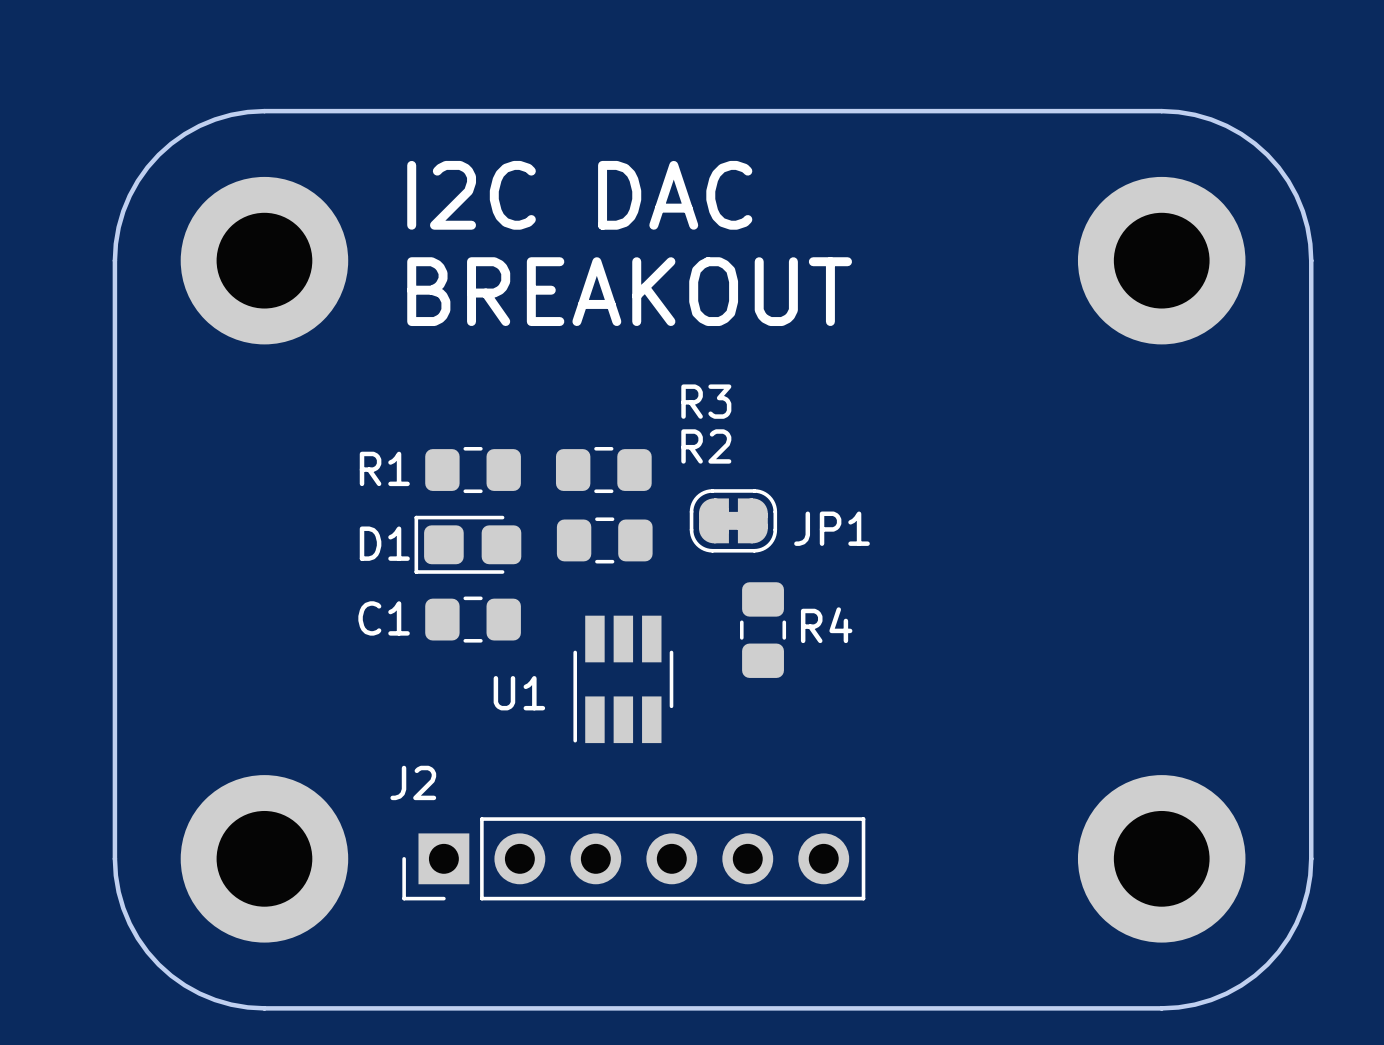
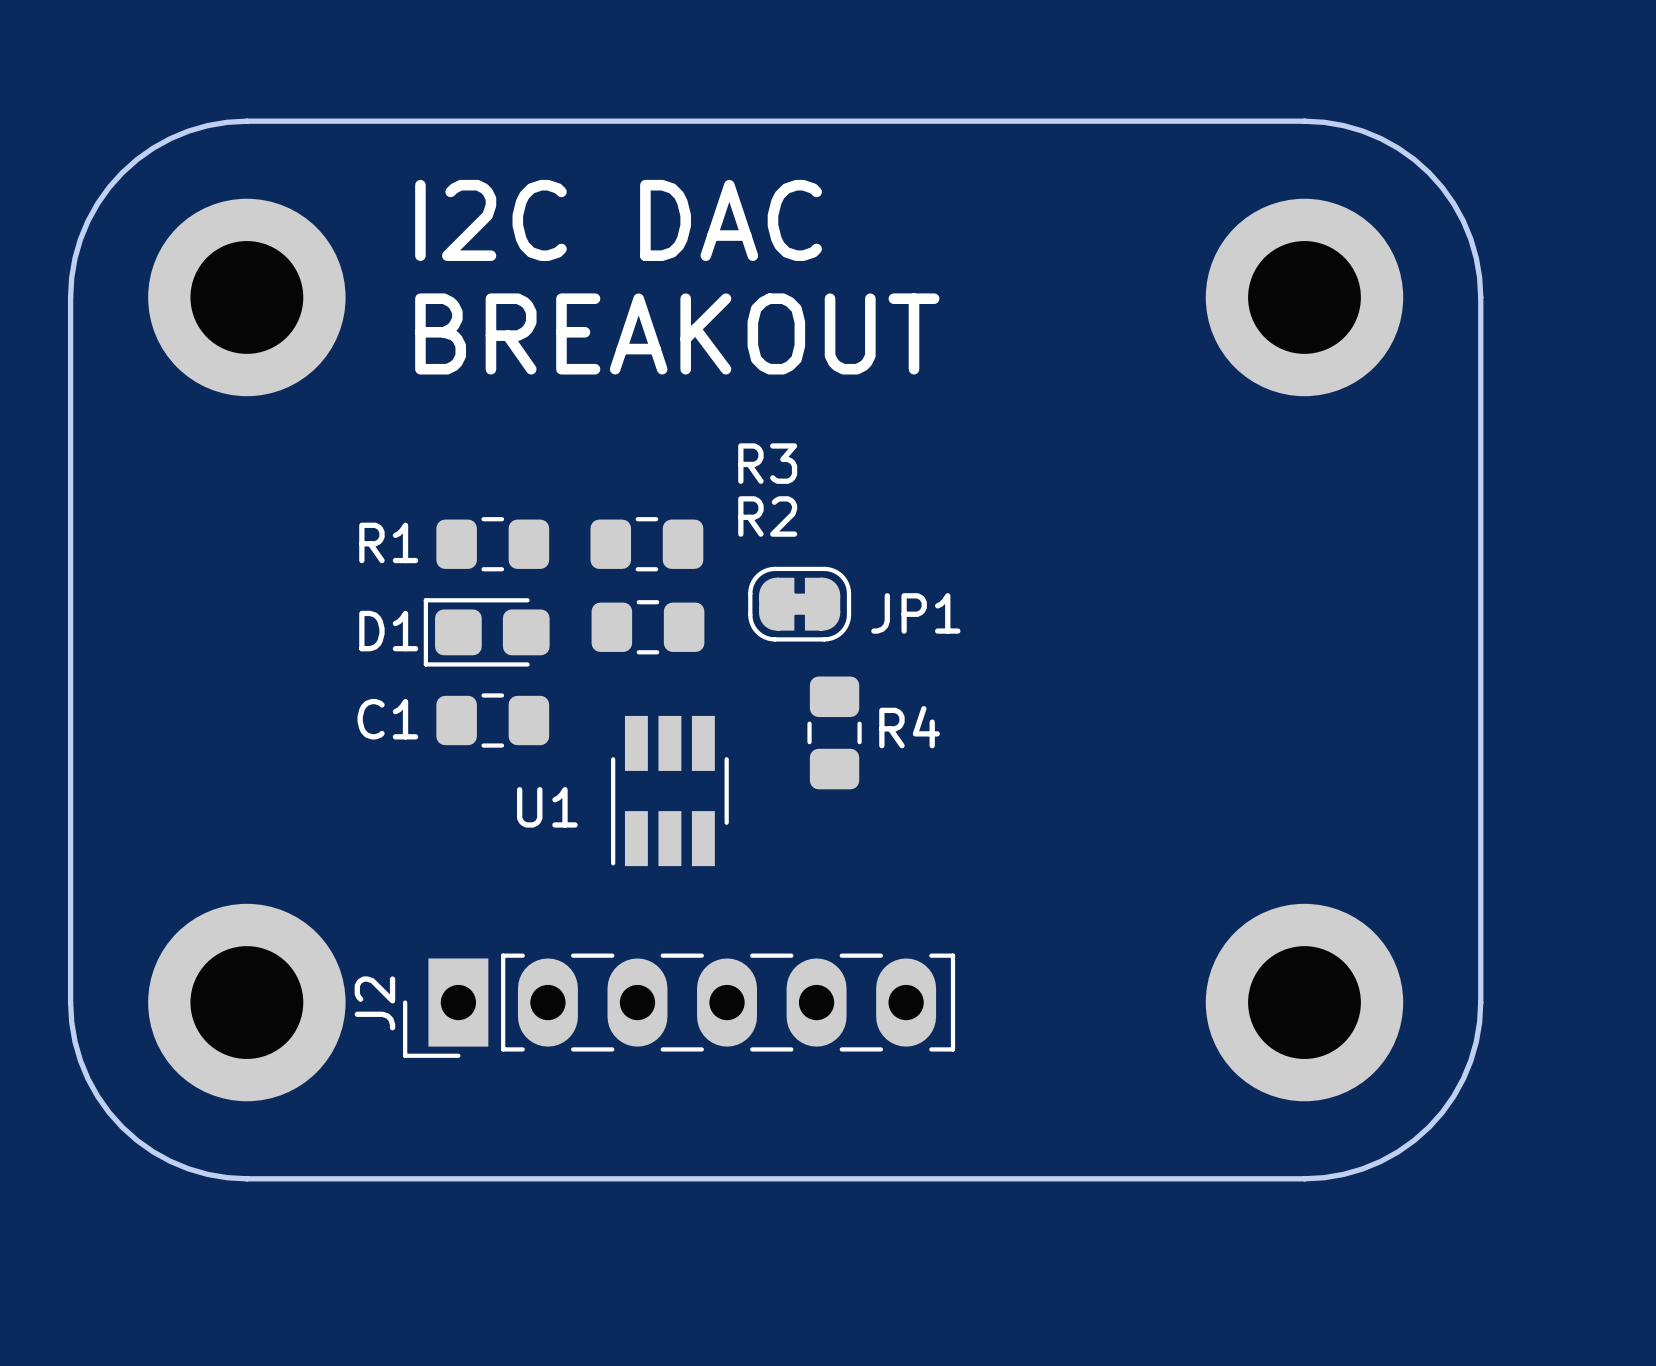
J2 name position: J2 (413, 782) -> J2 (374, 1003)
J2 footprint: [402, 817, 866, 901] -> [403, 953, 956, 1058]

